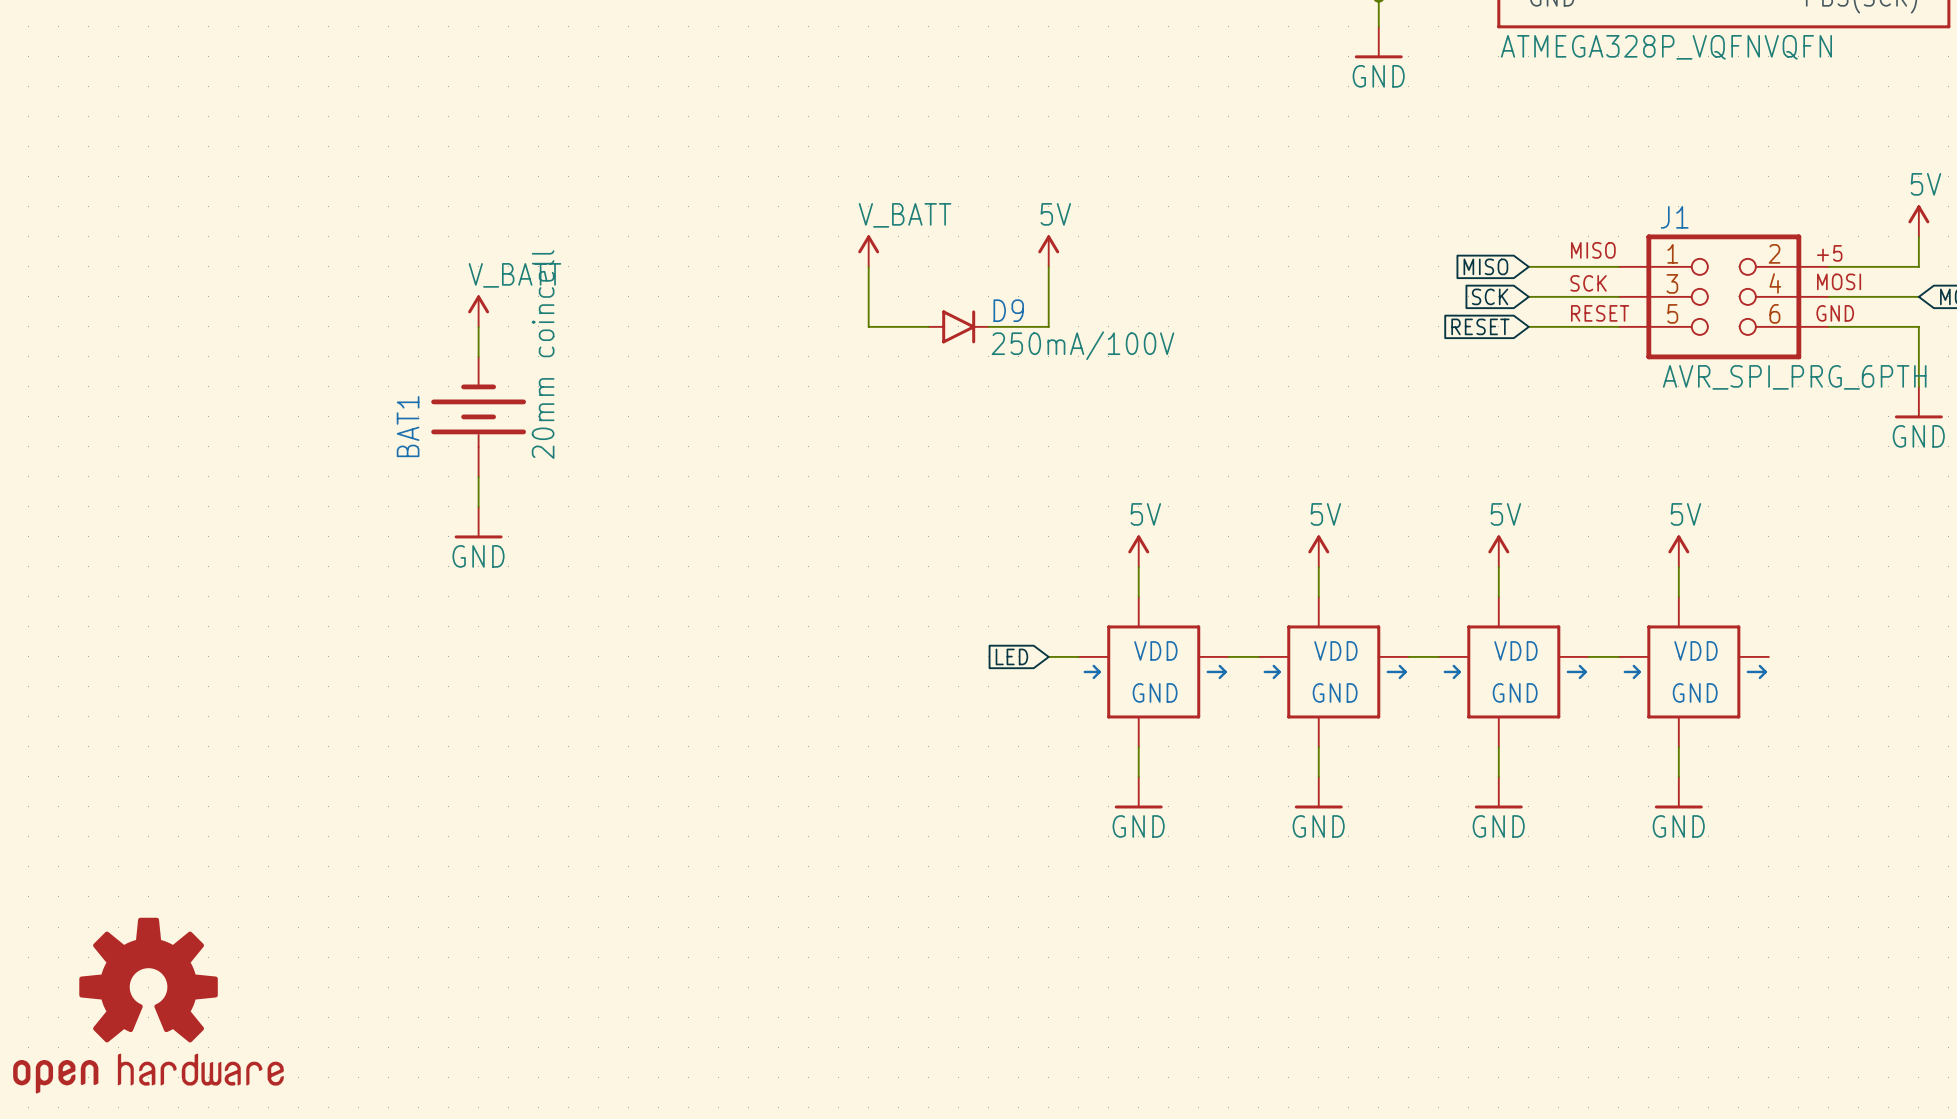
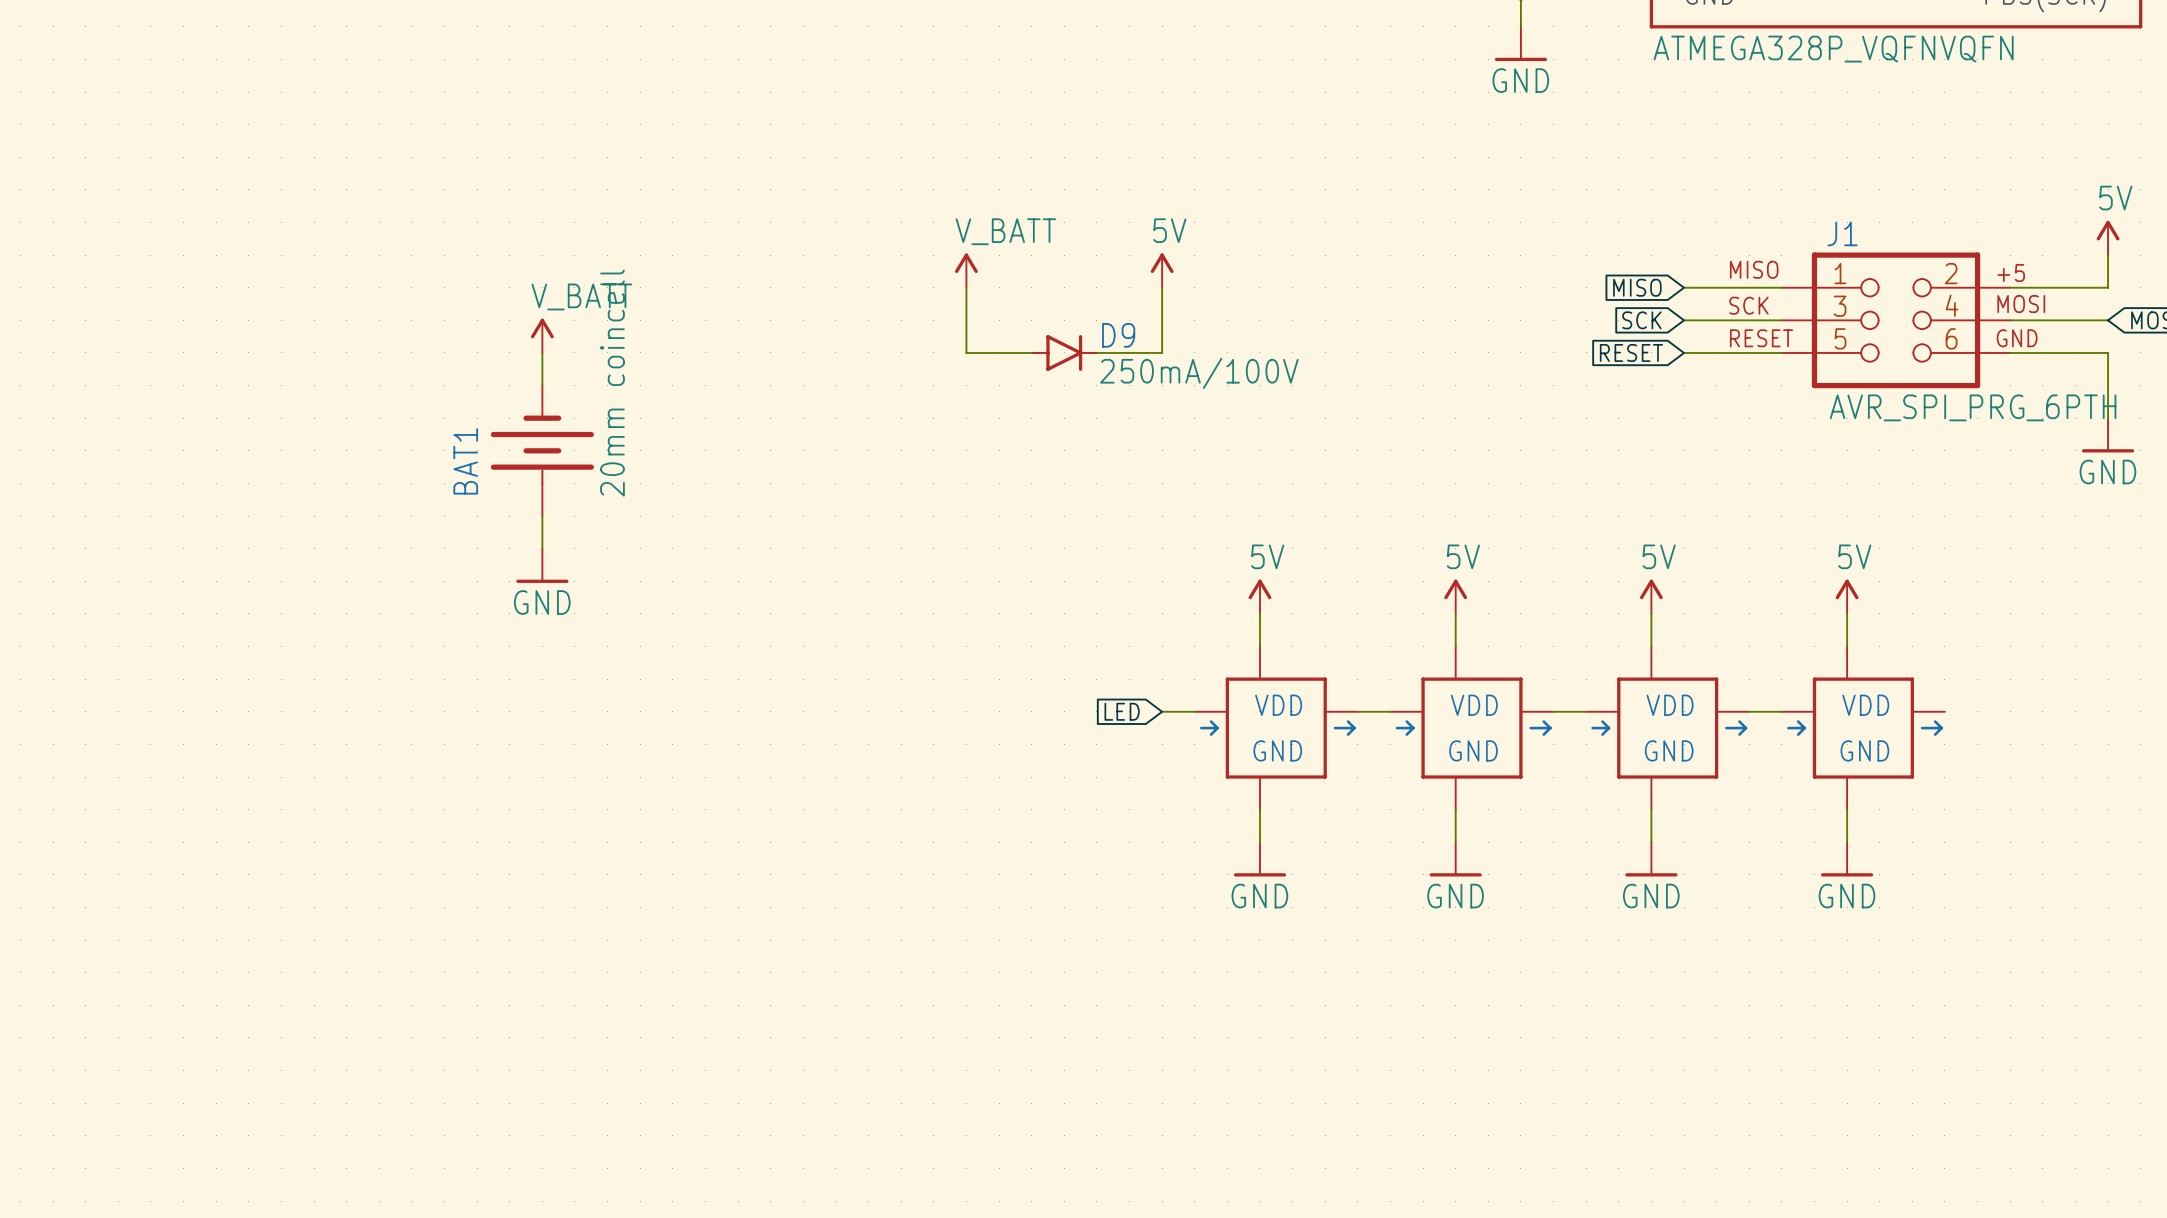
part: (148, 1005) -> none

